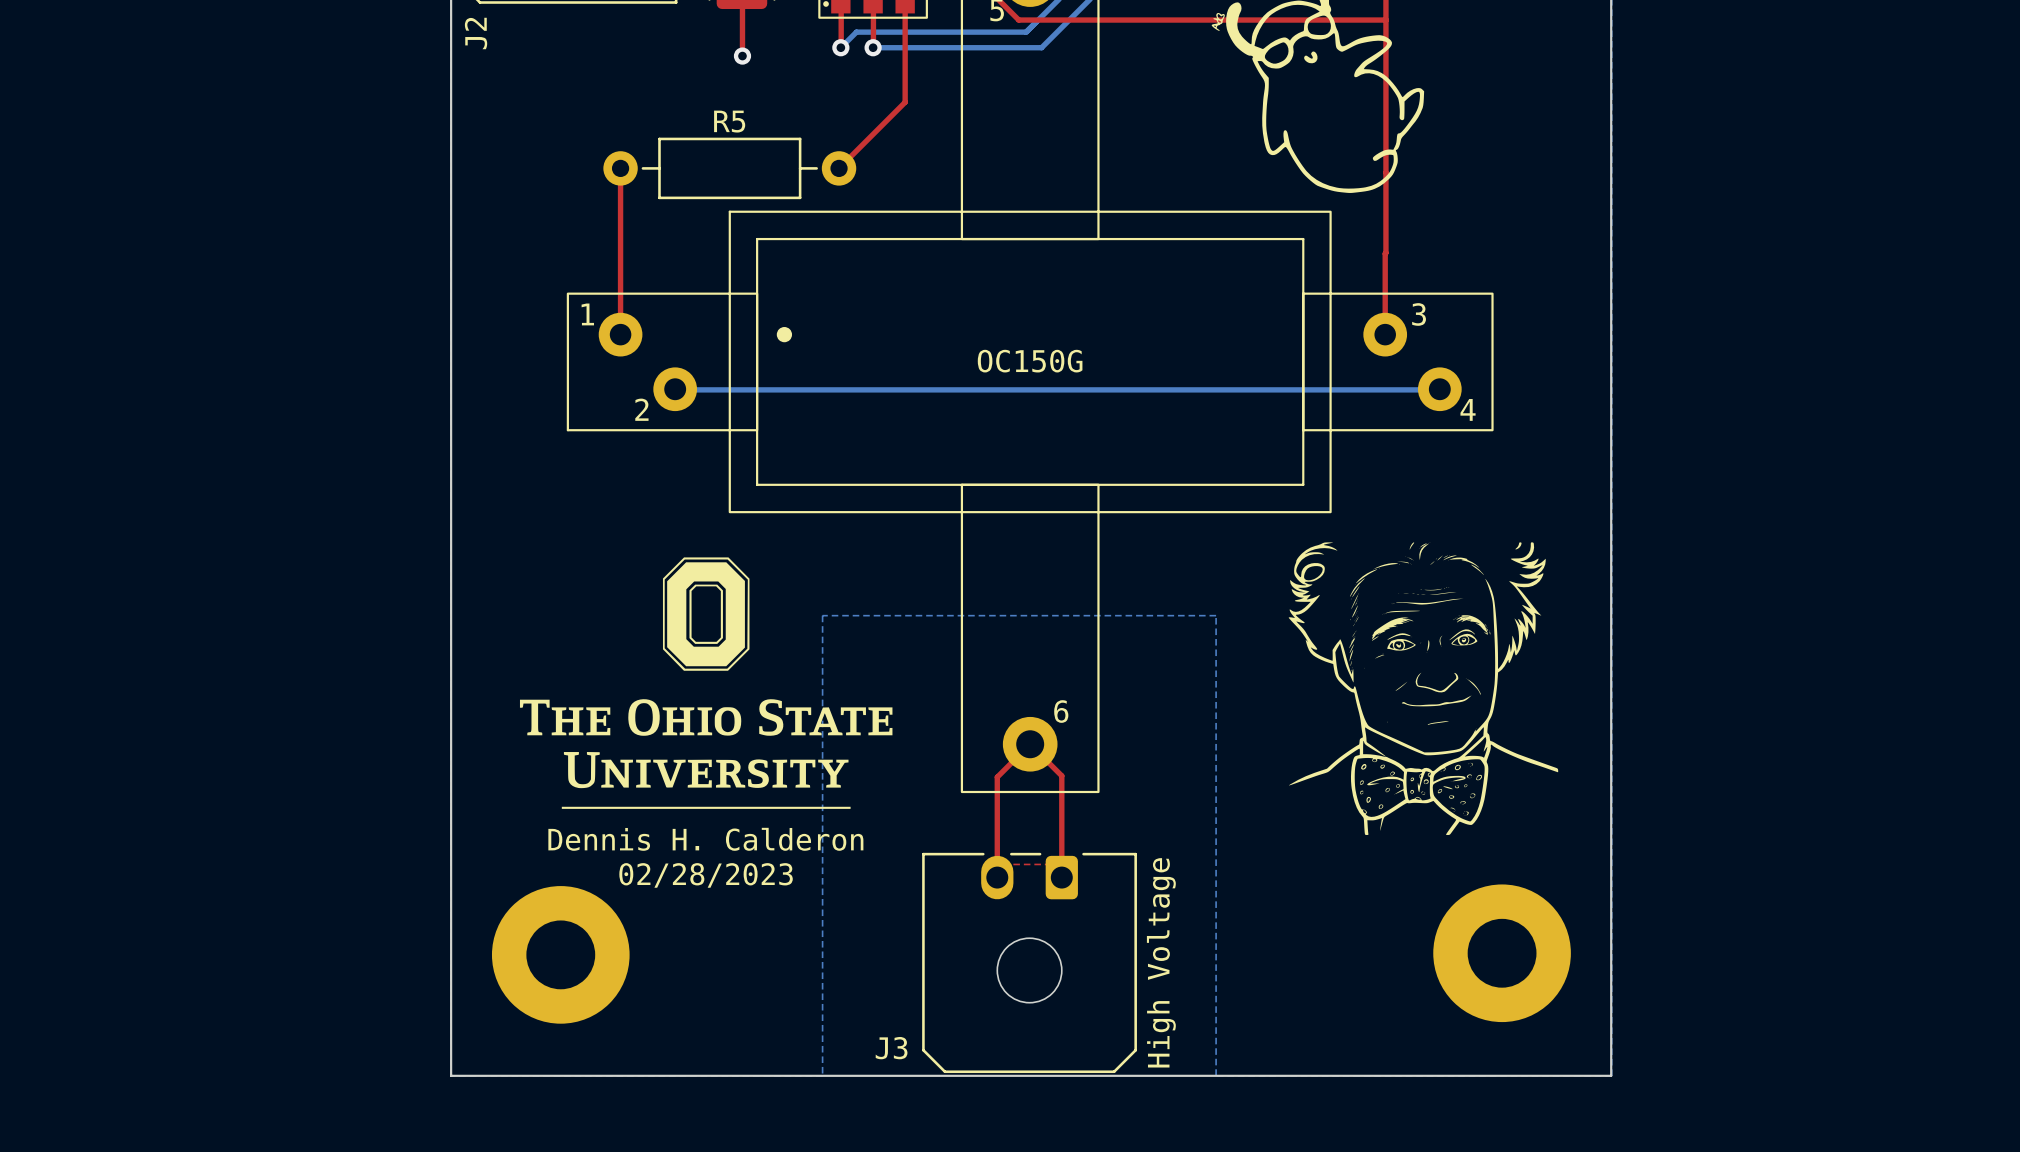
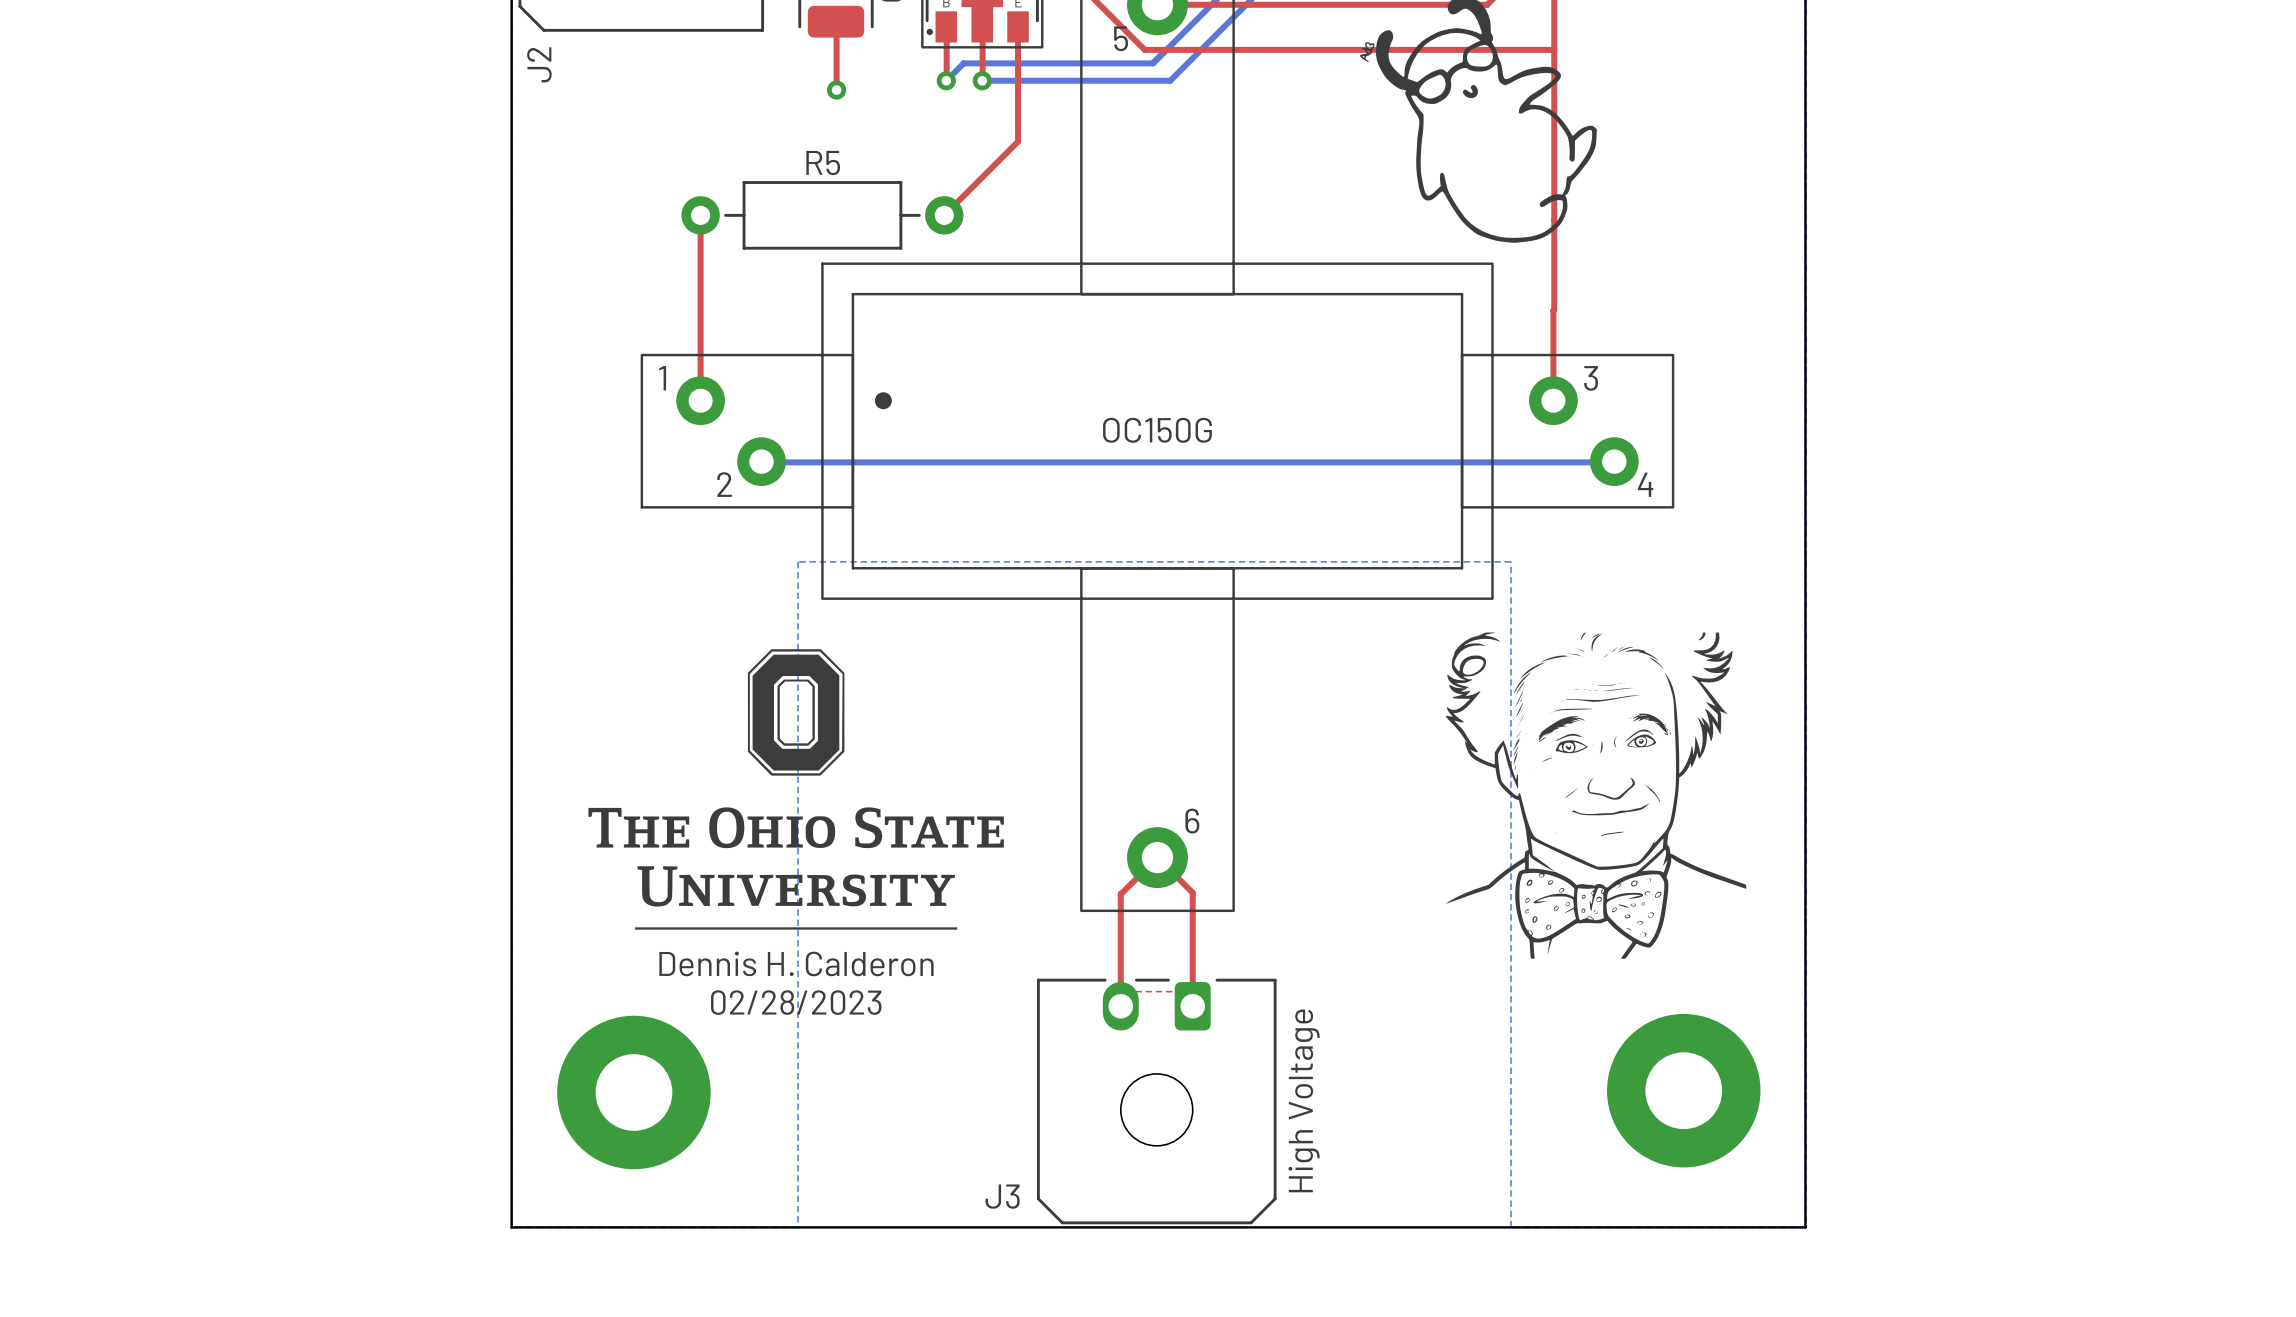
bottom zone outline: (707, 1075) (822, 1075) (822, 615) (1216, 615) (1216, 1075) (1347, 1075) -> (798, 1227) (798, 561) (1510, 561) (1510, 1227)

